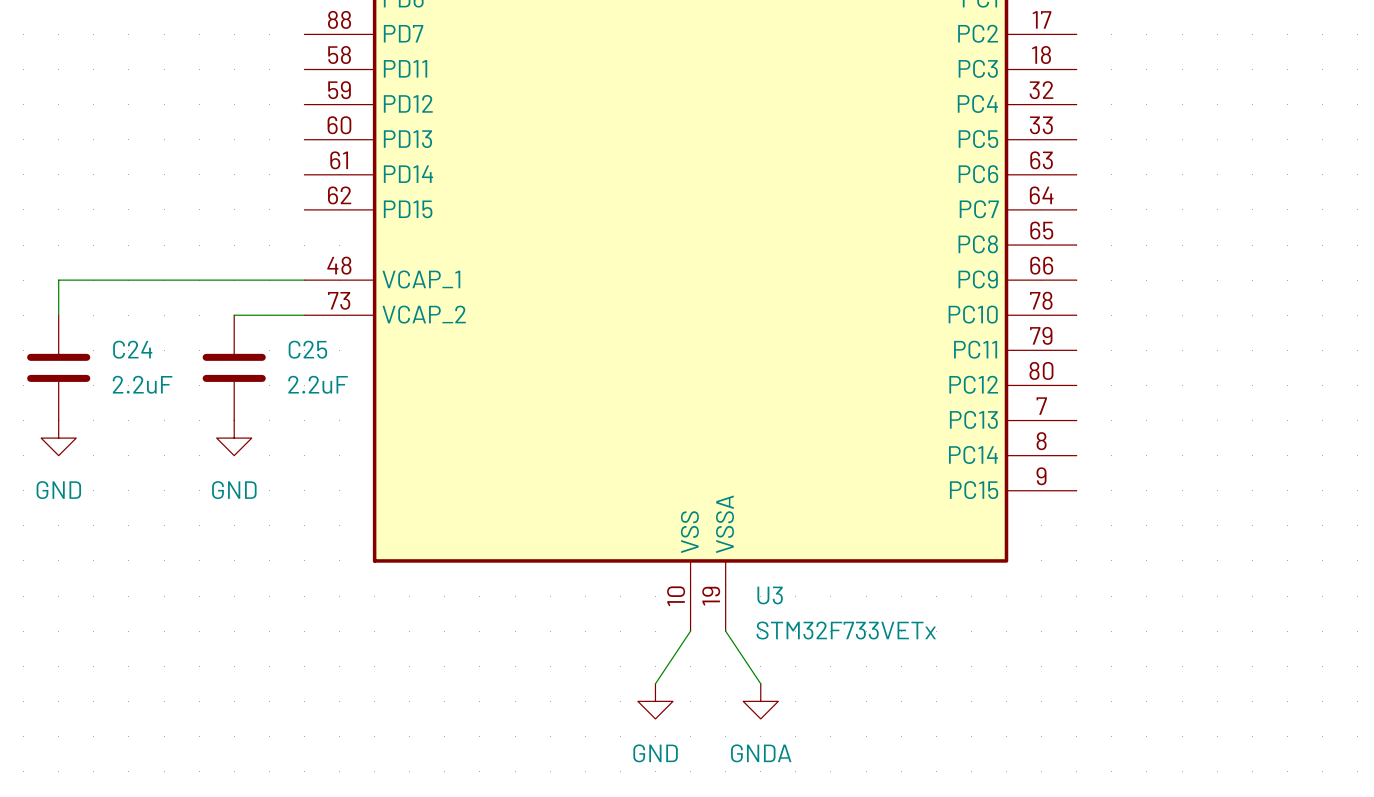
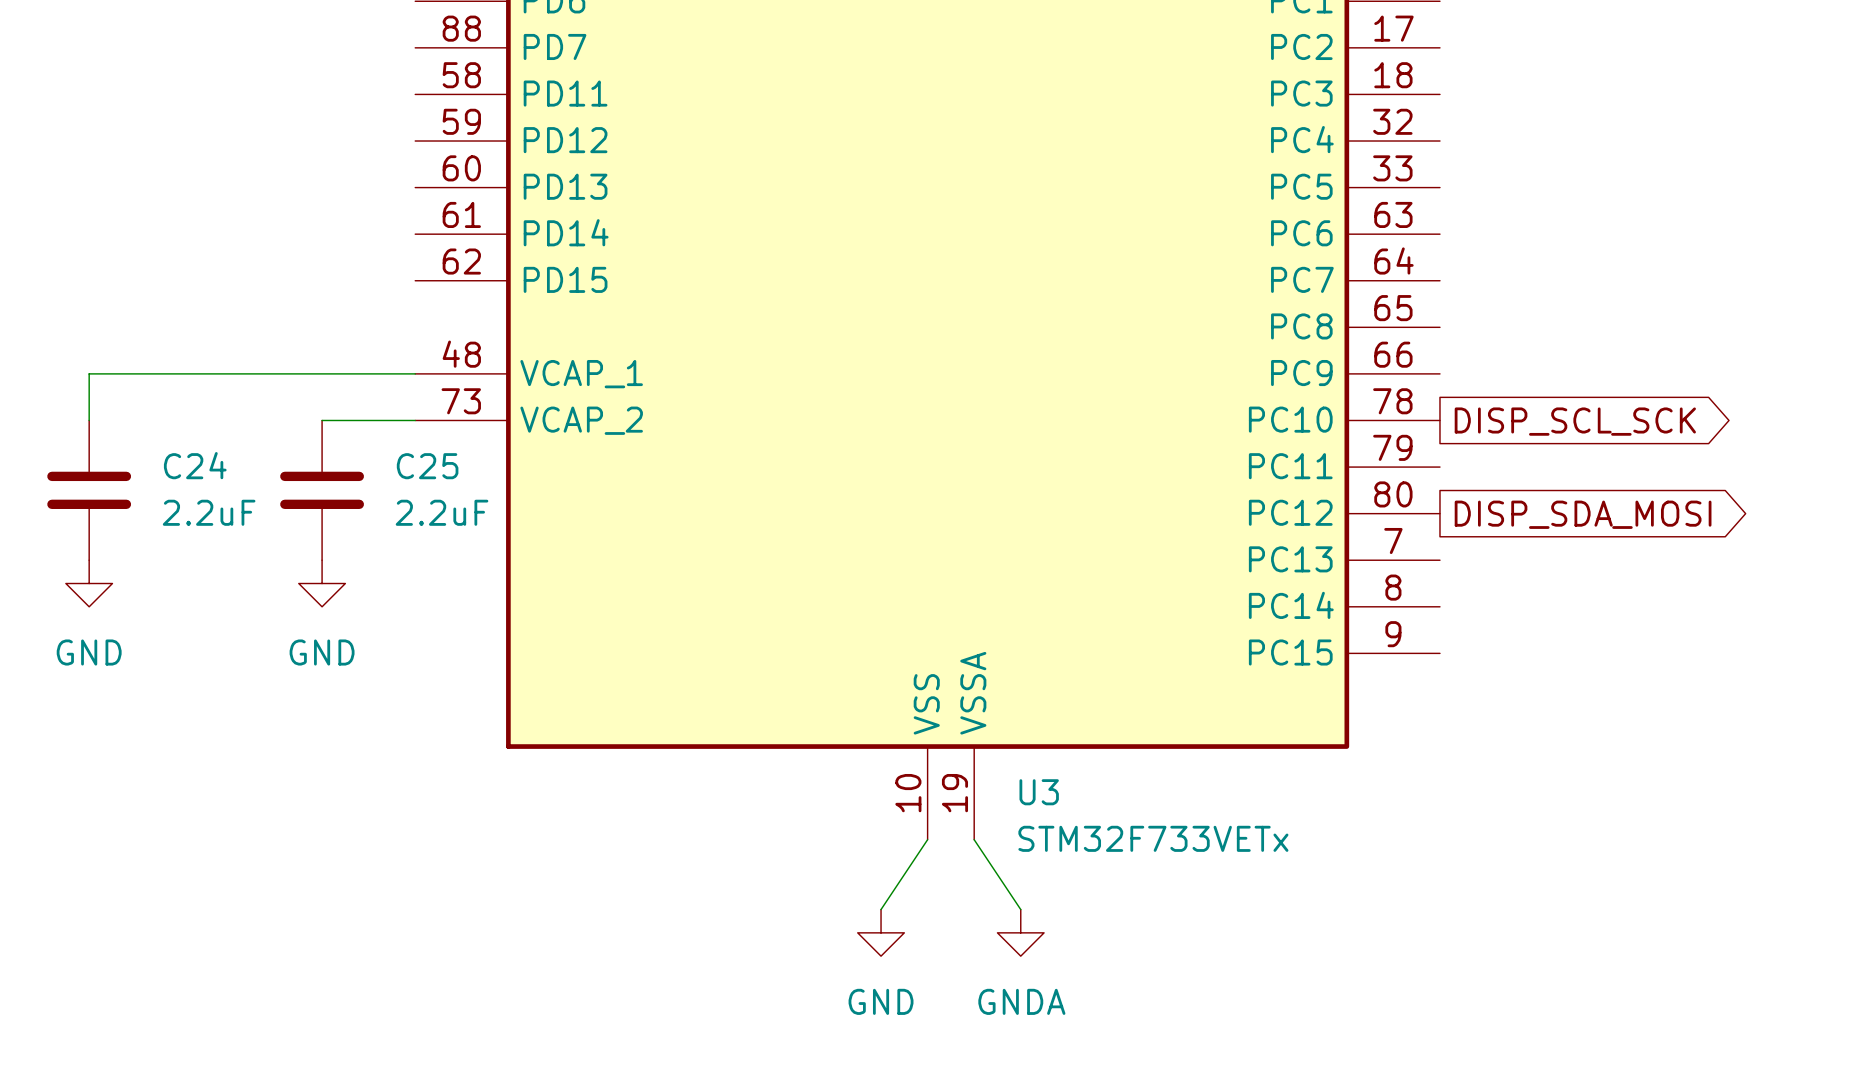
global label: none -> DISP_SCL_SCK (1575, 421)
global label: none -> DISP_SDA_MOSI (1583, 514)

